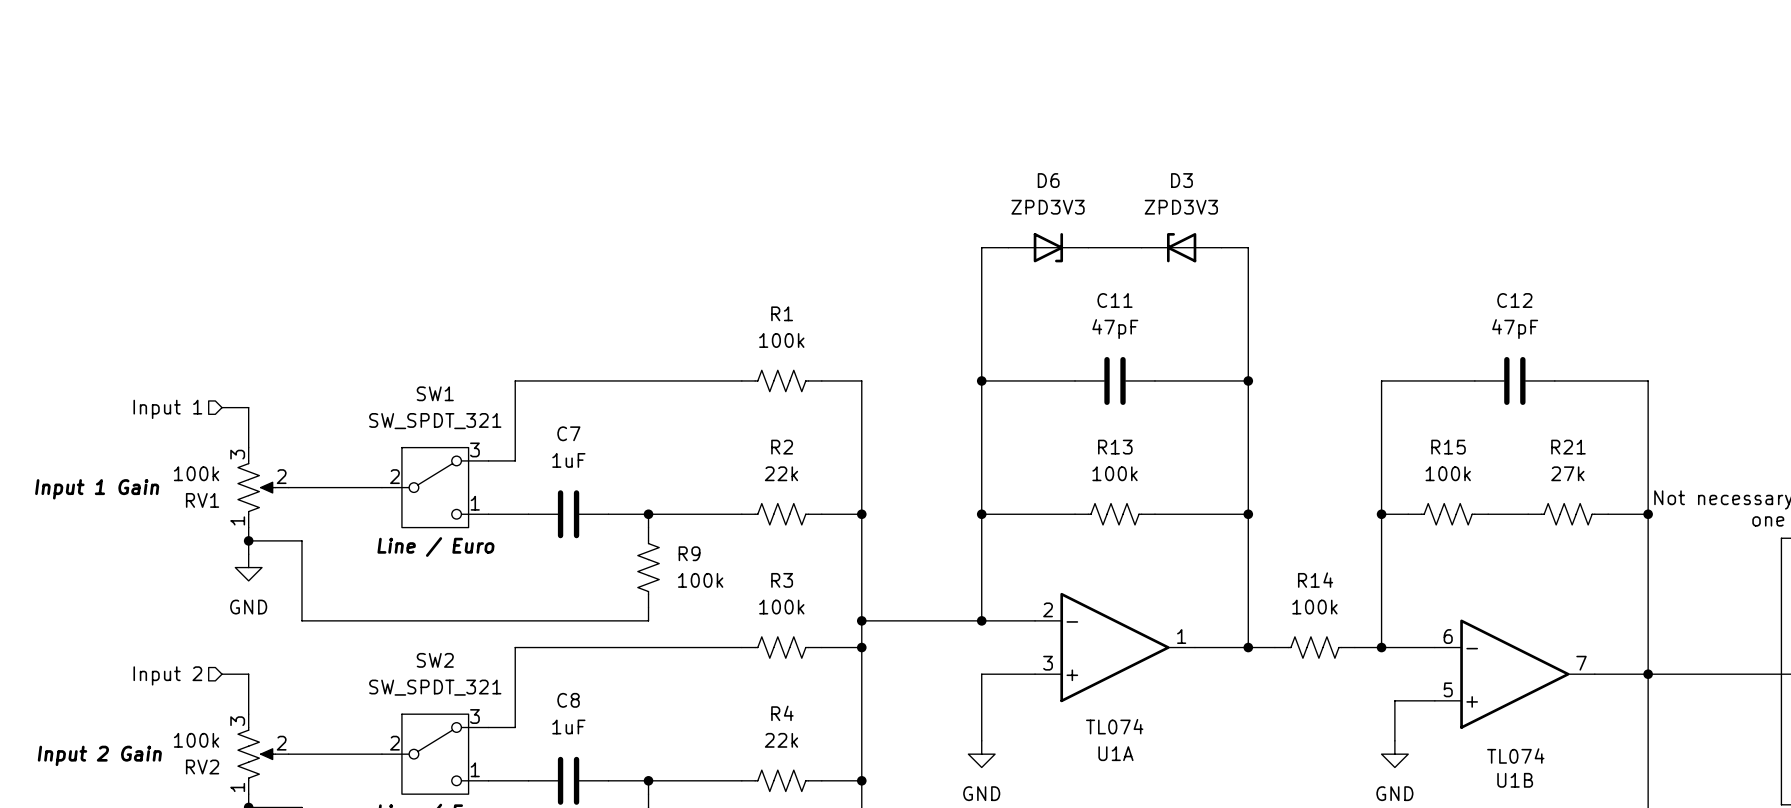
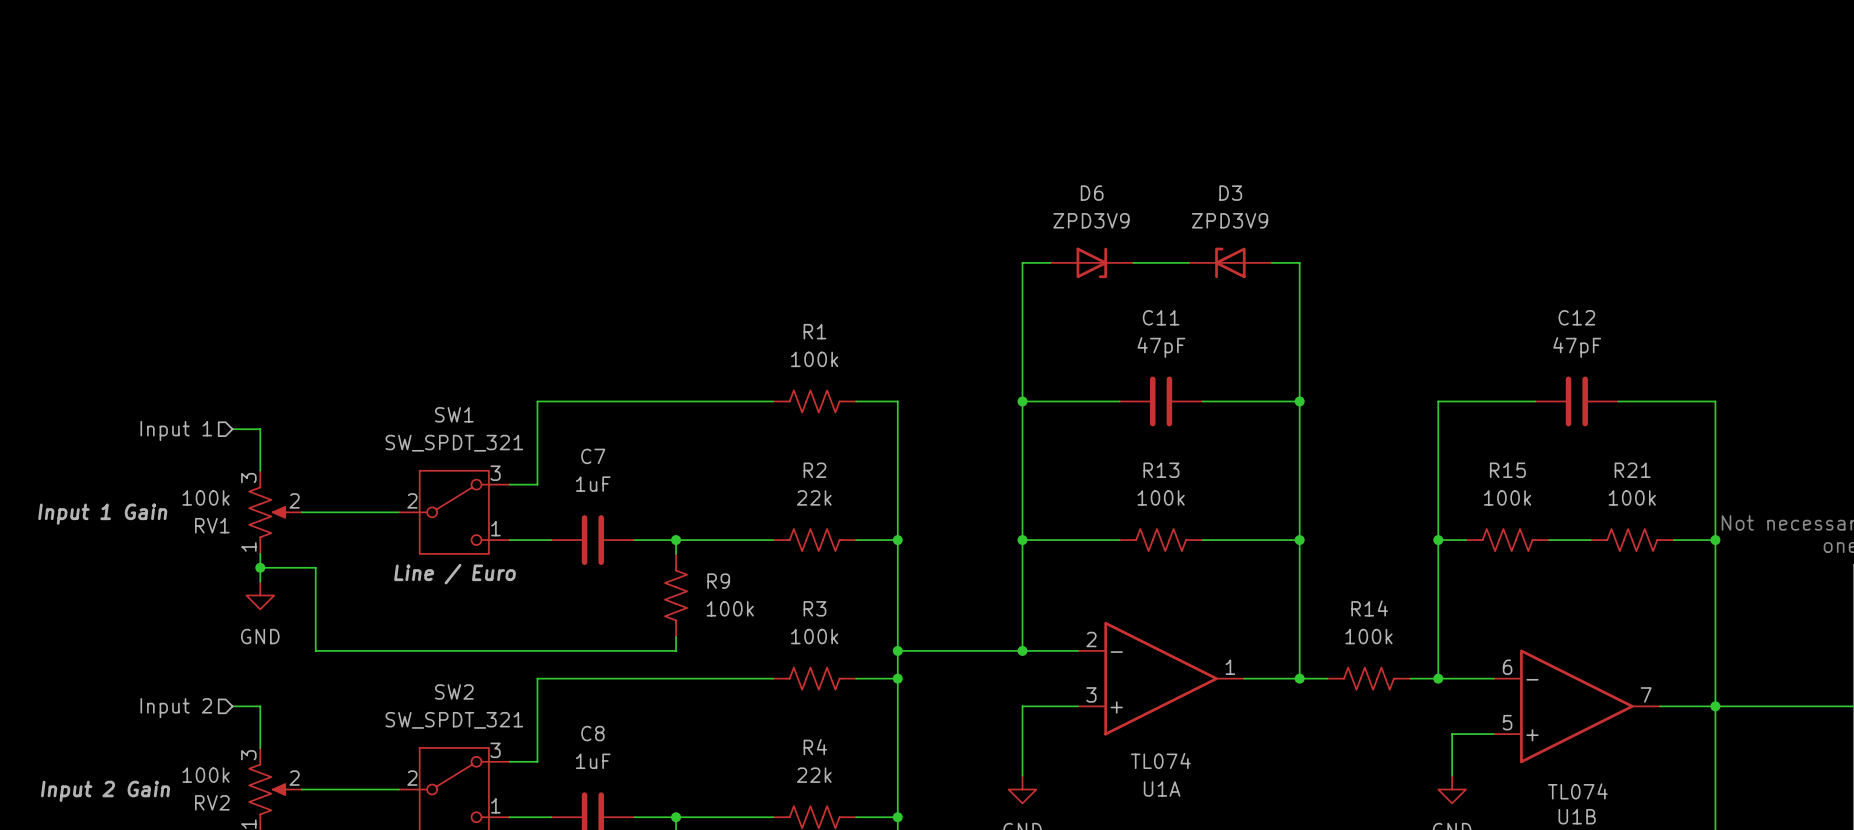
D6 value: ZPD3V3 (1048, 207) -> ZPD3V9 (1091, 220)
D3 value: ZPD3V3 (1181, 207) -> ZPD3V9 (1230, 220)
R21 value: 27k (1567, 473) -> 100k (1632, 497)

